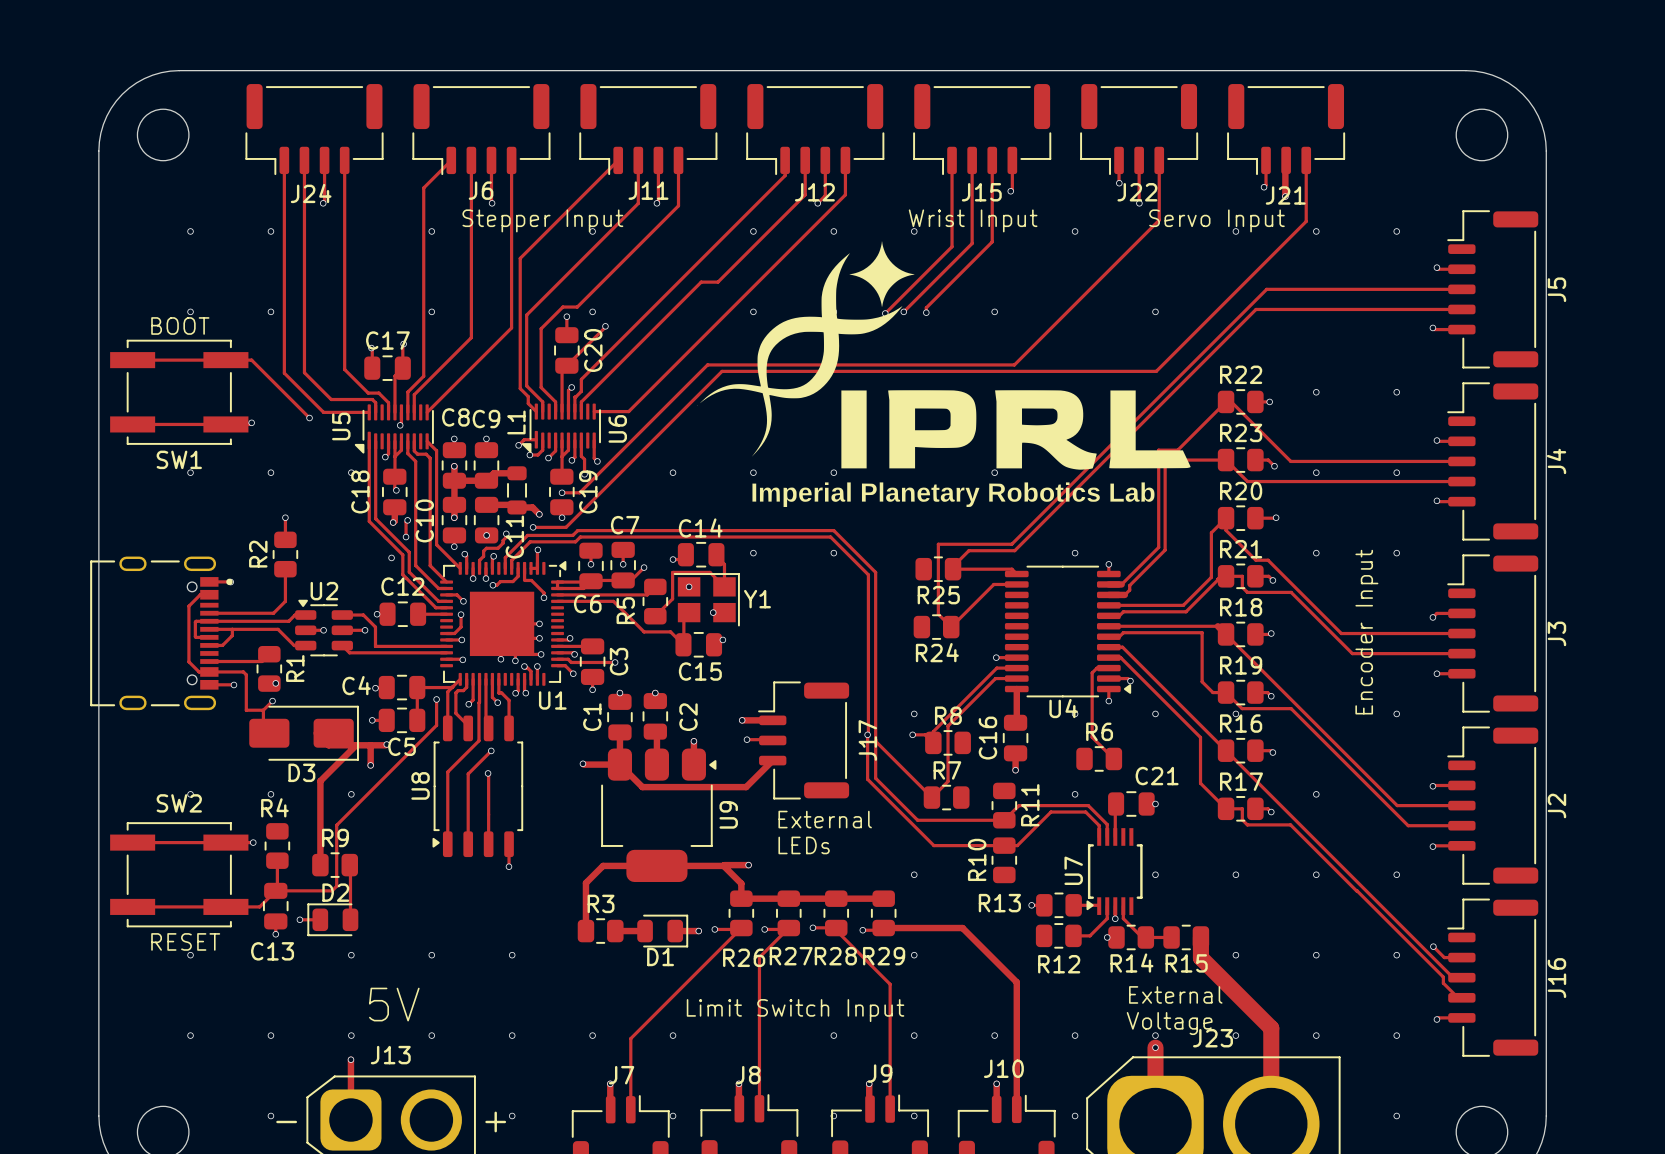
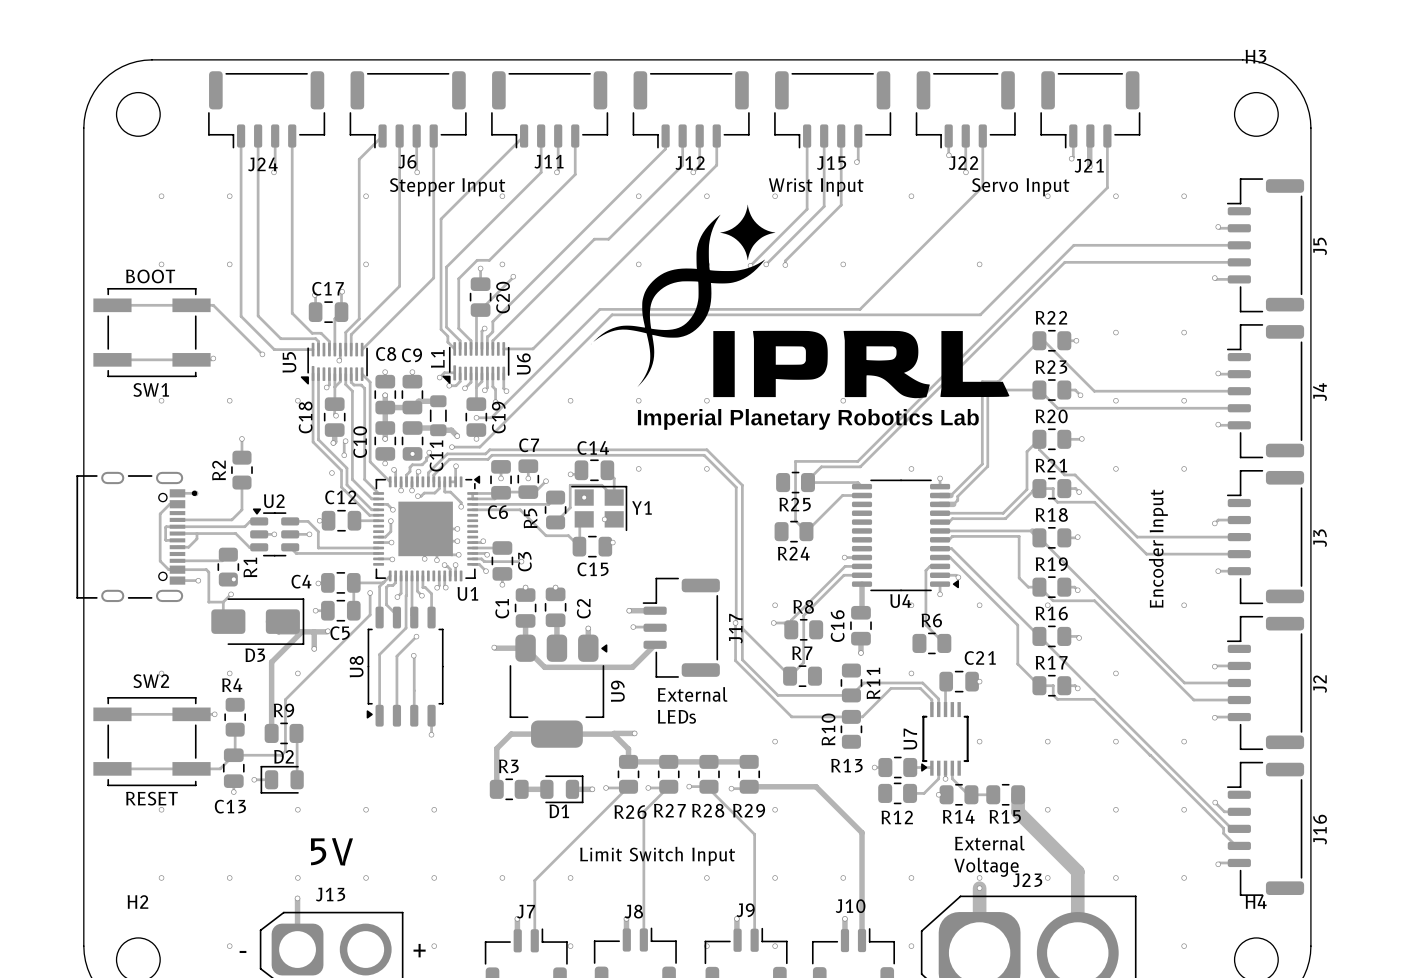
H3 name: none -> H3 (1255, 56)
H2 name: none -> H2 (137, 901)
H4 name: none -> H4 (1256, 901)

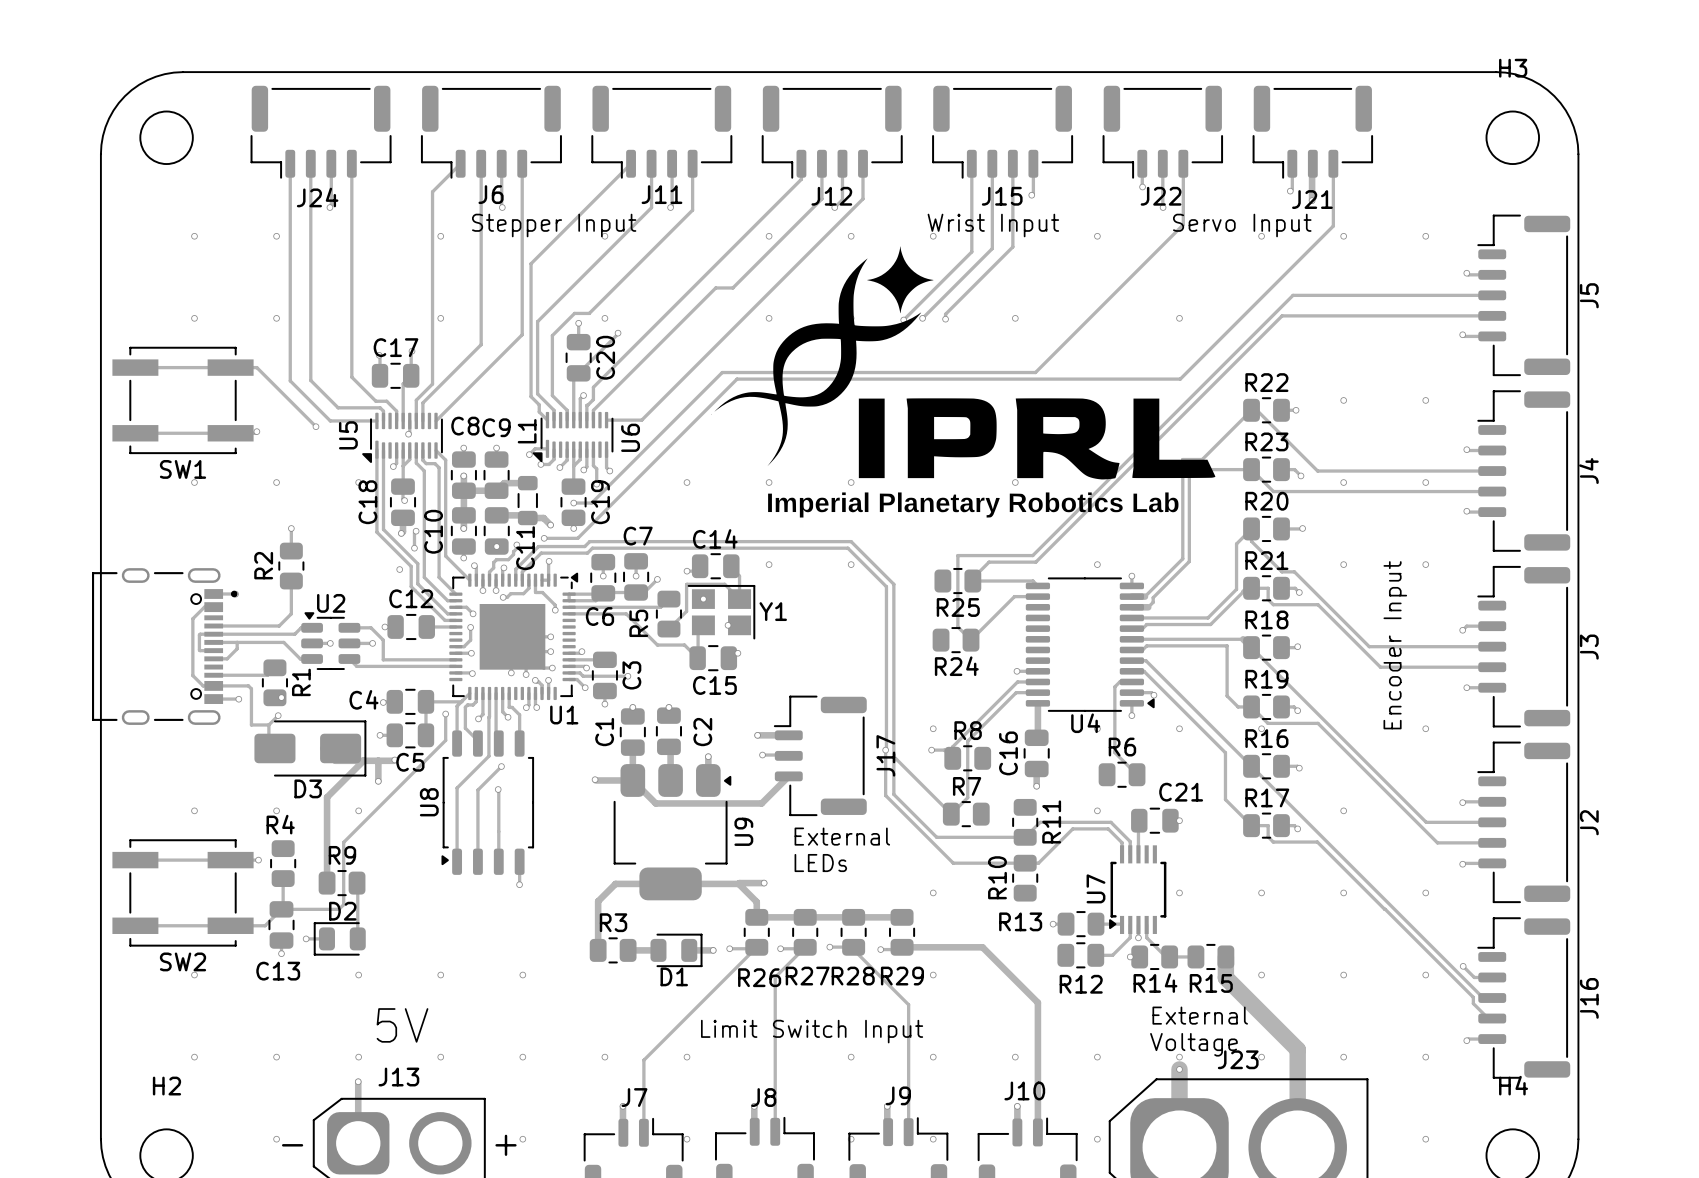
text: BOOT (150, 276) -> none
SW2 name position: SW2 (151, 681) -> SW2 (183, 961)
text: RESET (151, 798) -> none

